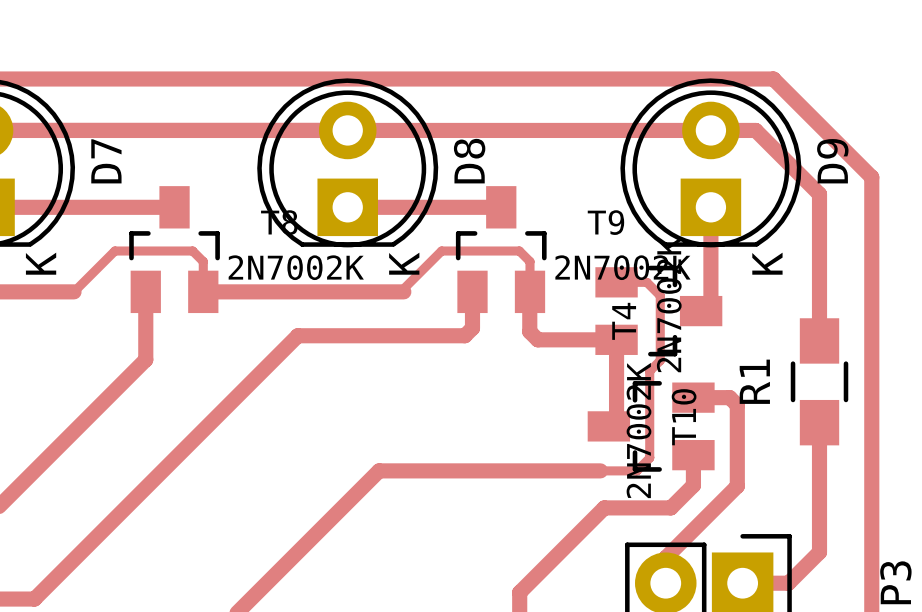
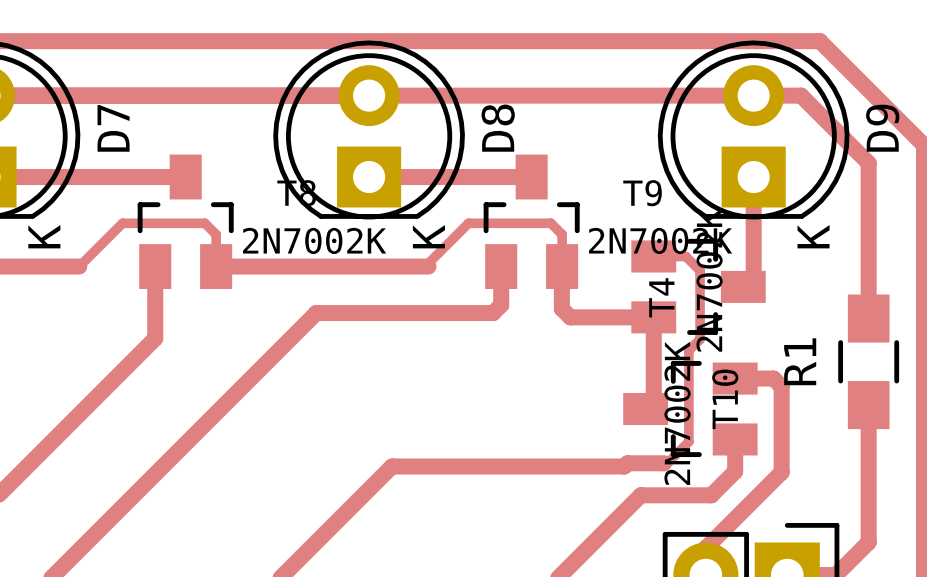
track: (649, 457) (636, 470) (589, 470) -> none
track: (600, 470) (379, 470) (369, 480) -> (688, 441) (664, 466) (664, 463) (627, 463) (624, 466) (391, 466)

